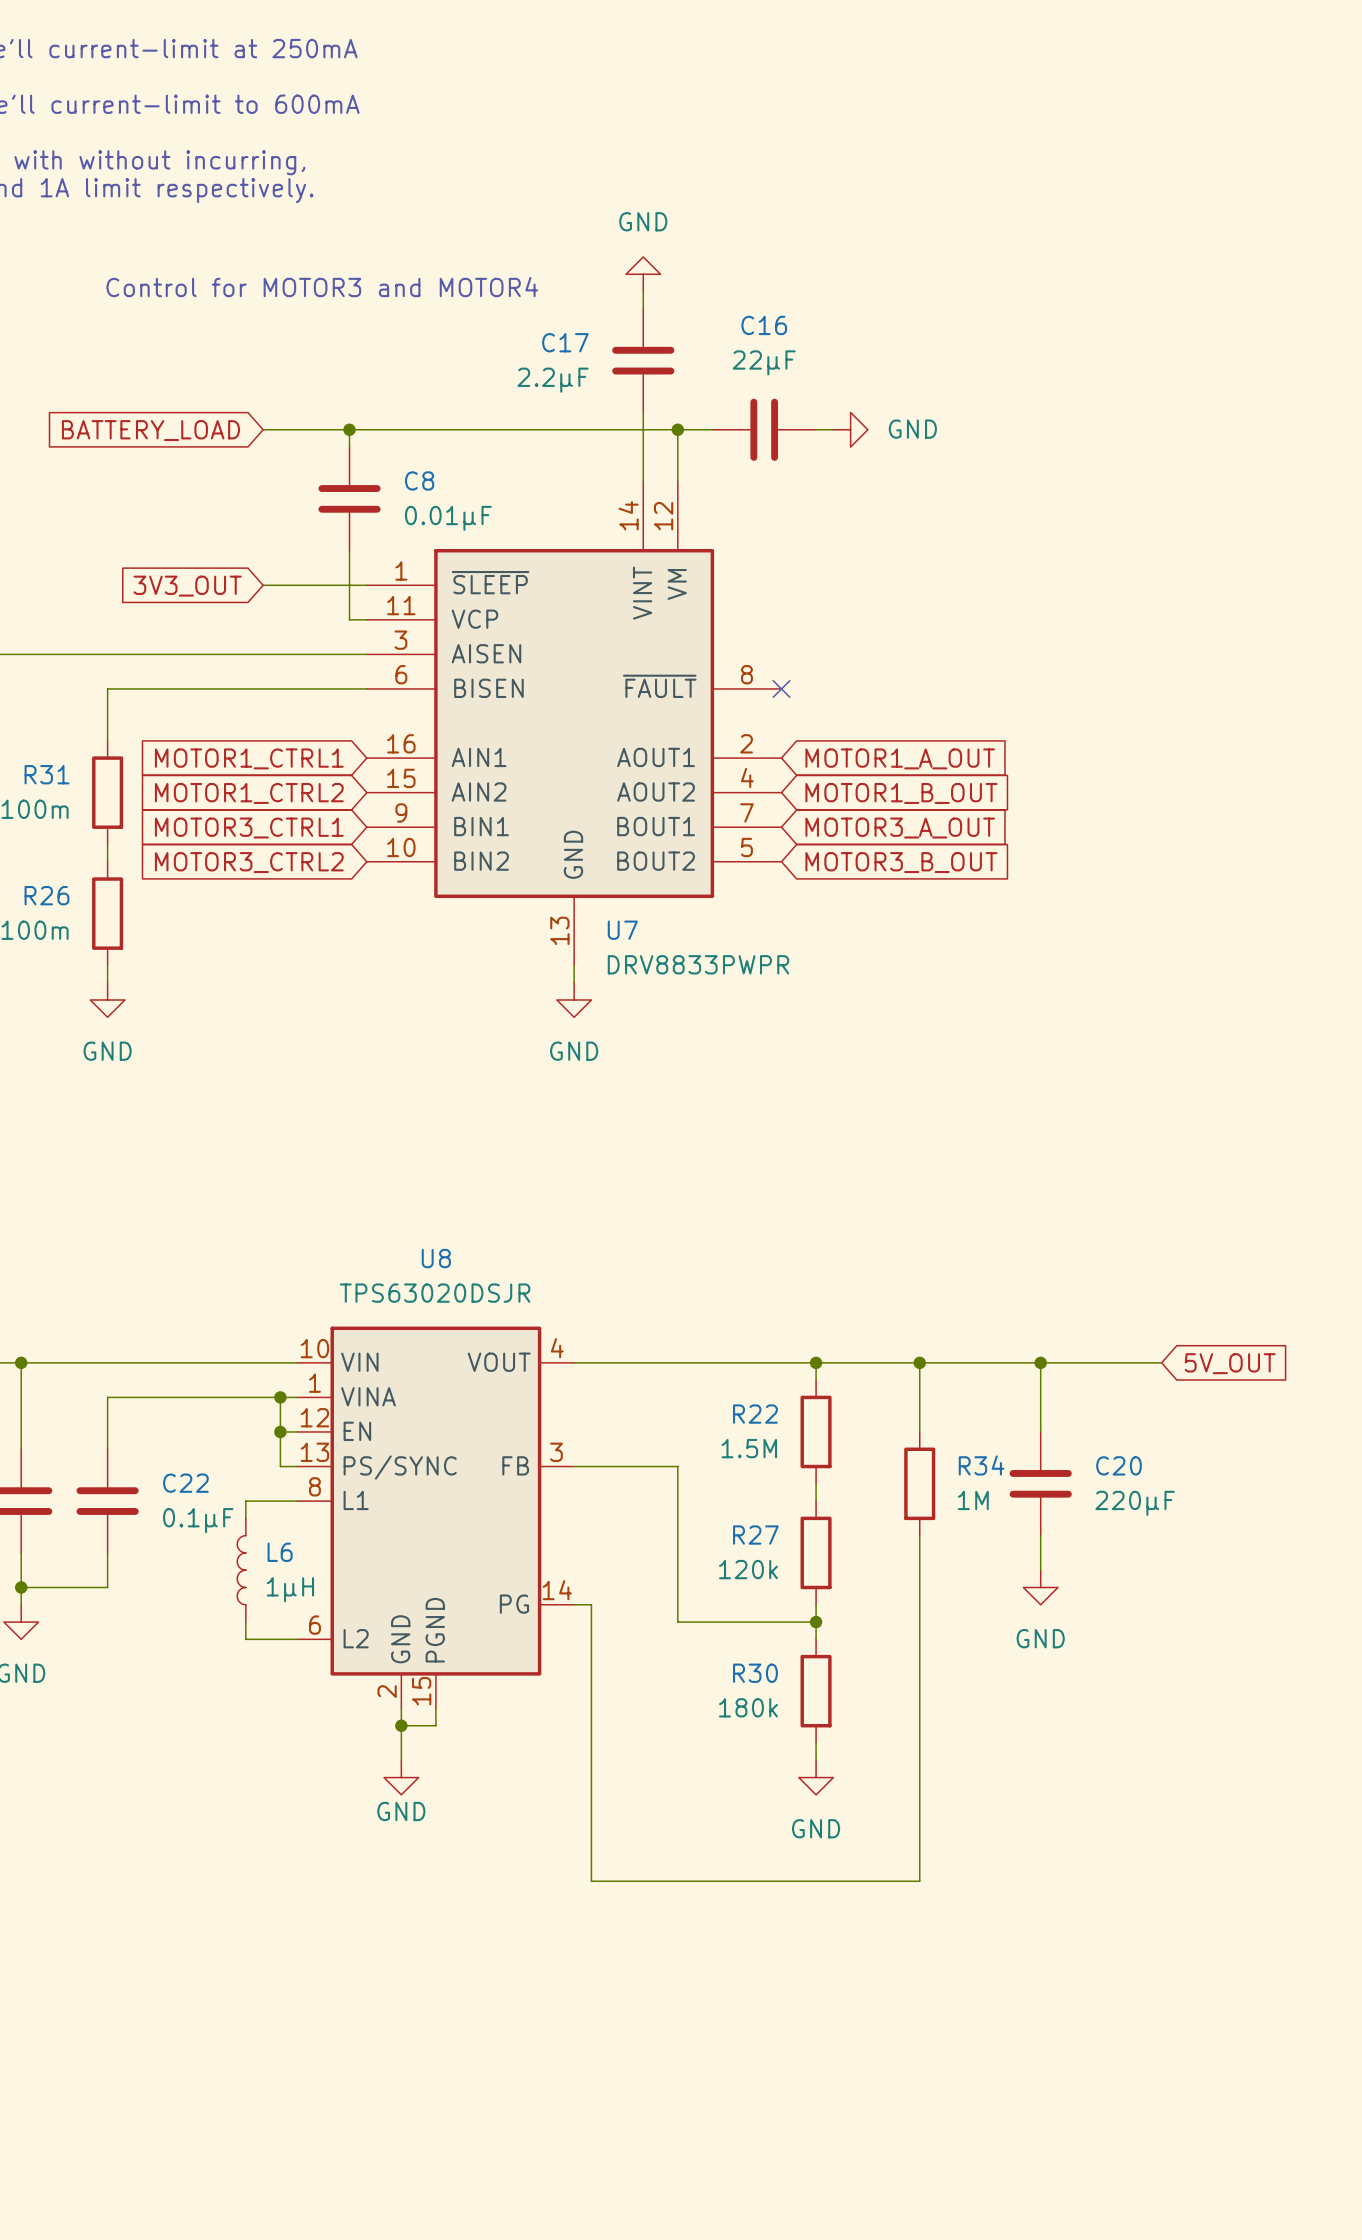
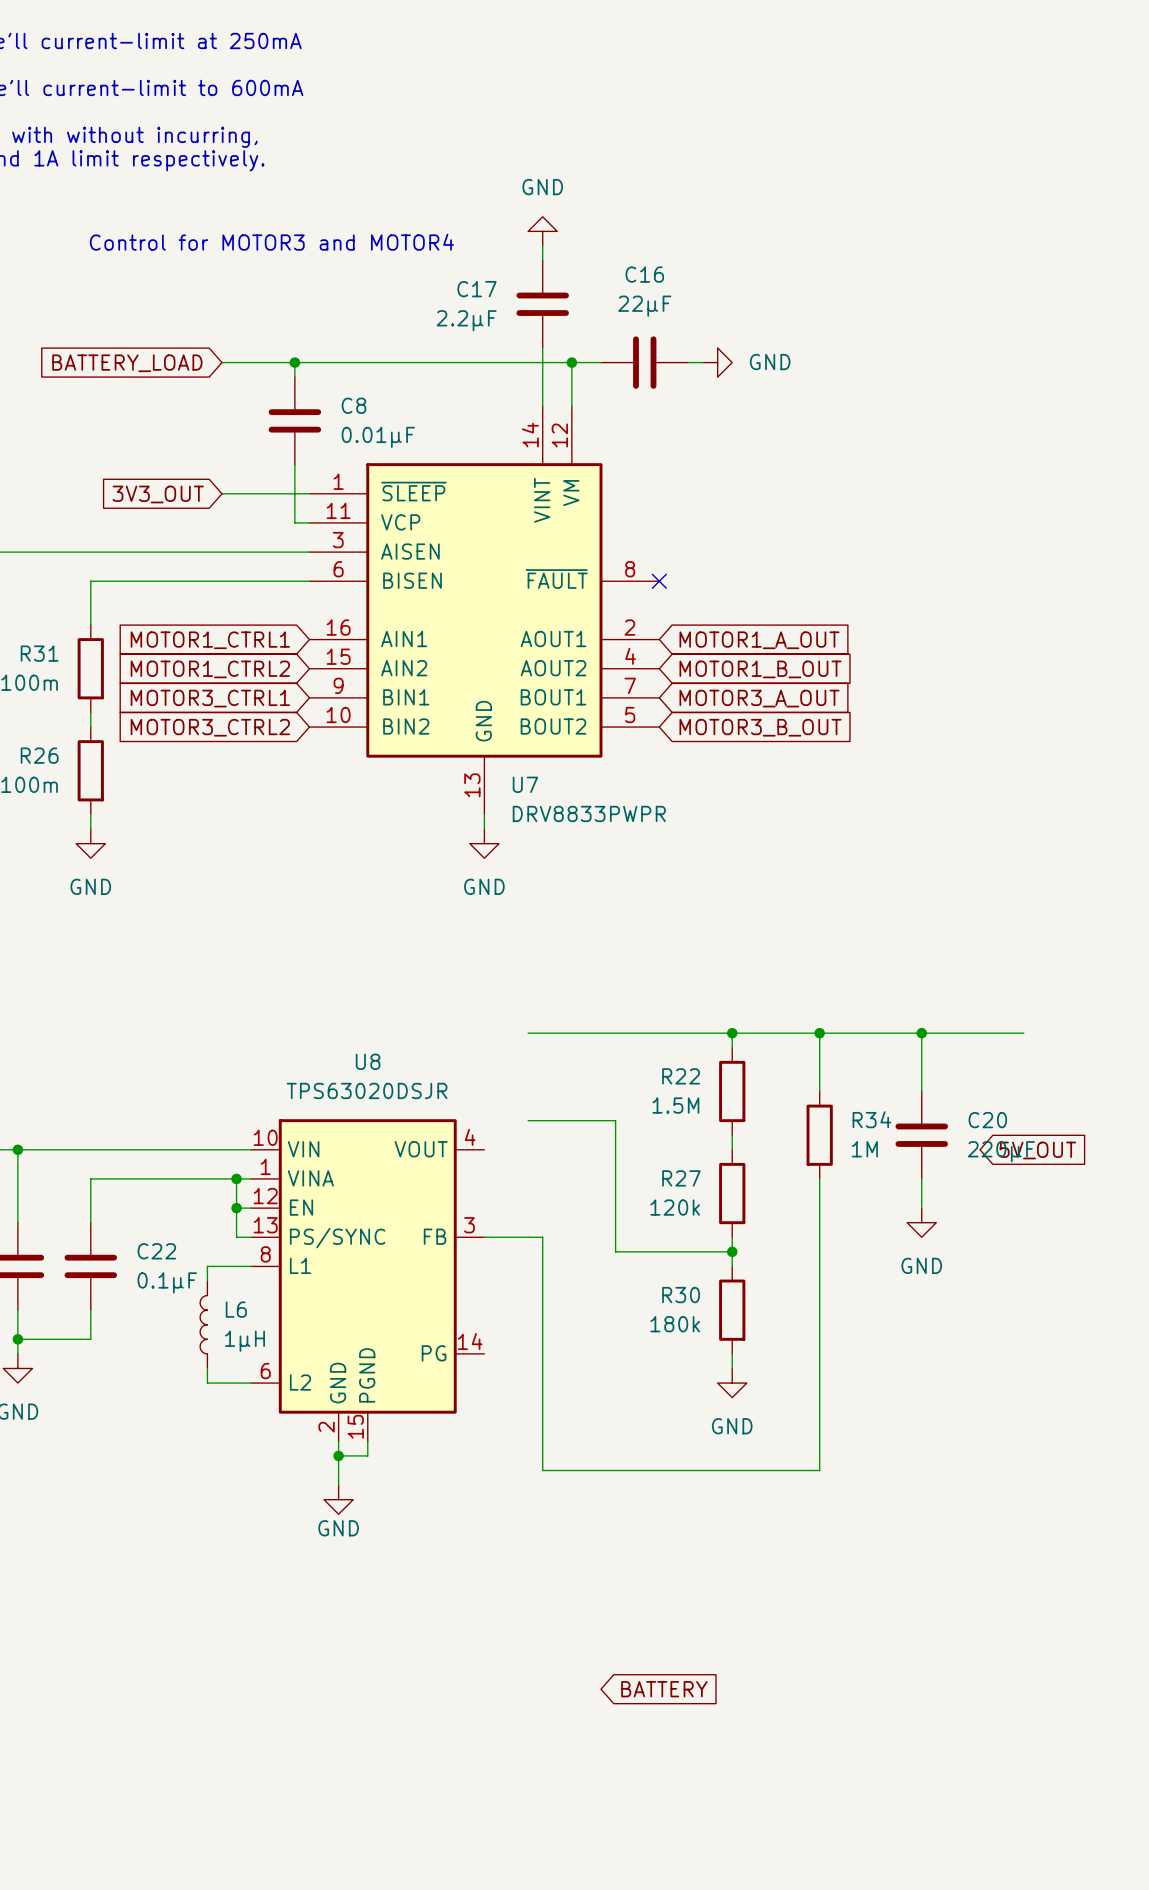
junction: none -> (732, 1033)
junction: none -> (819, 1033)
junction: none -> (921, 1033)
wire: none -> (528, 1120) (615, 1120) (615, 1251) (732, 1251)
wire: (574, 1362) (1161, 1362) -> (528, 1033) (1023, 1033)
wire: (816, 1362) (816, 1380) -> (732, 1033) (732, 1047)
junction: (816, 1362) -> none
wire: (919, 1362) (919, 1431) -> (819, 1033) (819, 1091)
junction: (919, 1362) -> none
wire: (1040, 1362) (1040, 1431) -> (921, 1033) (921, 1091)
junction: (1040, 1362) -> none
R22 position: (816, 1431) -> (732, 1091)
power symbol: none -> GND (921, 1222)
wire: (643, 1466) (677, 1466) (677, 1622) (816, 1622) -> (542, 1237) (542, 1470) (819, 1470) (819, 1178)
wire: (816, 1483) (816, 1501) -> (732, 1135) (732, 1149)
junction: none -> (732, 1251)
R34 position: (919, 1483) -> (819, 1135)
C20 position: (1040, 1483) -> (921, 1135)
wire: (919, 1535) (919, 1881) (591, 1881) (591, 1604) (574, 1604) -> none
wire: (1040, 1535) (1040, 1570) -> (921, 1178) (921, 1208)
R27 position: (816, 1552) -> (732, 1193)
power symbol: GND (1040, 1587) -> none
wire: (816, 1604) (816, 1639) -> (732, 1237) (732, 1266)
junction: (816, 1622) -> none
power symbol: none -> GND (732, 1383)
R30 position: (816, 1691) -> (732, 1310)
wire: (816, 1743) (816, 1760) -> (732, 1353) (732, 1368)
power symbol: GND (816, 1777) -> none
global label: none -> BATTERY (664, 1689)

